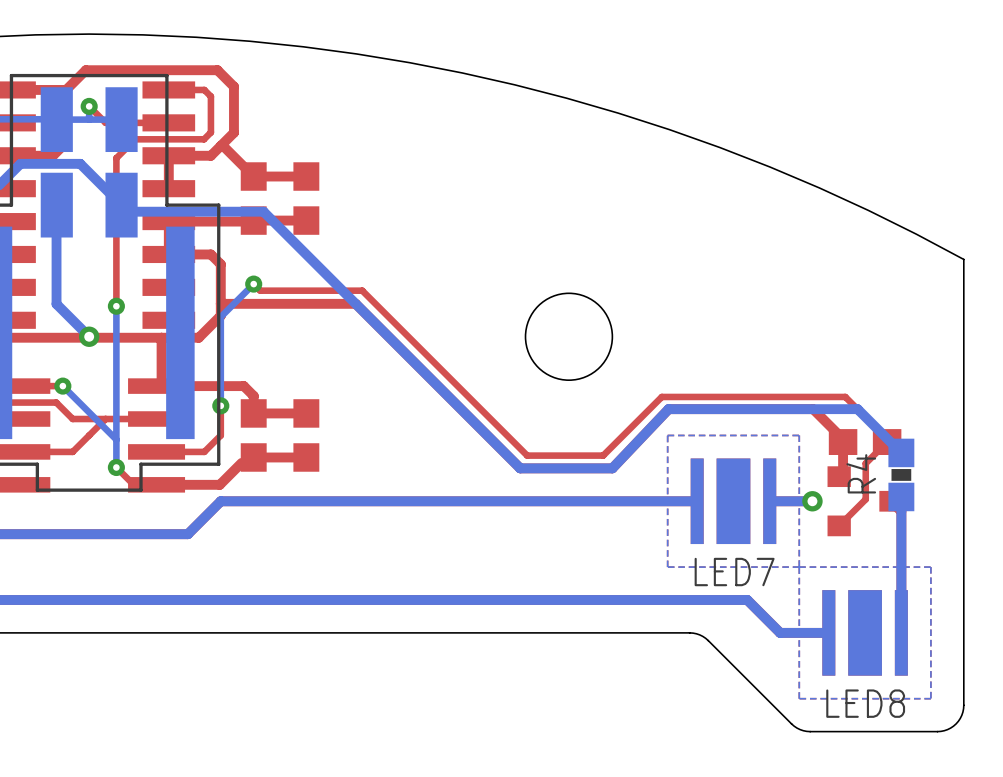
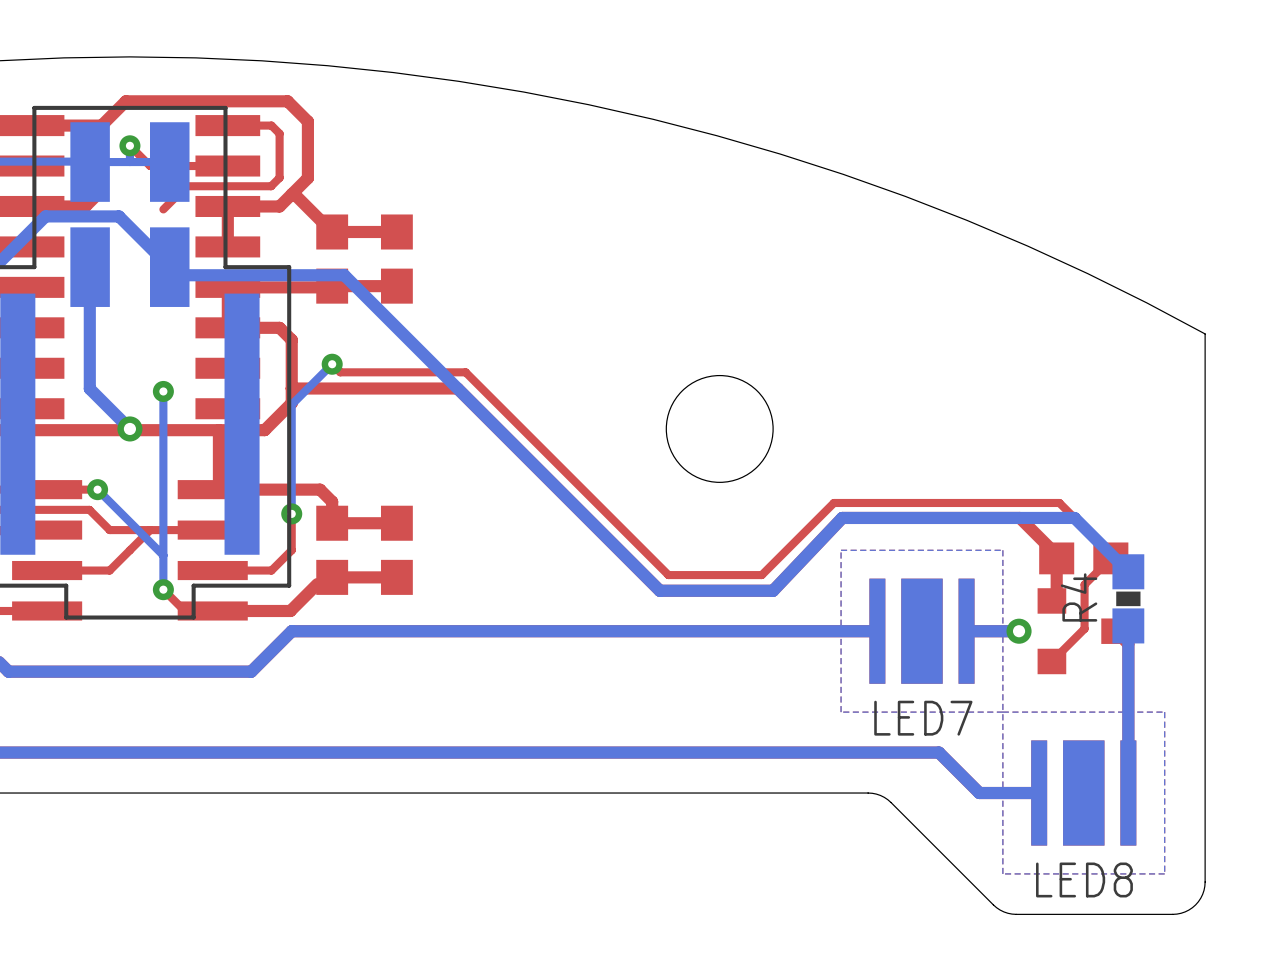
top track: (116, 158) (116, 306) -> none

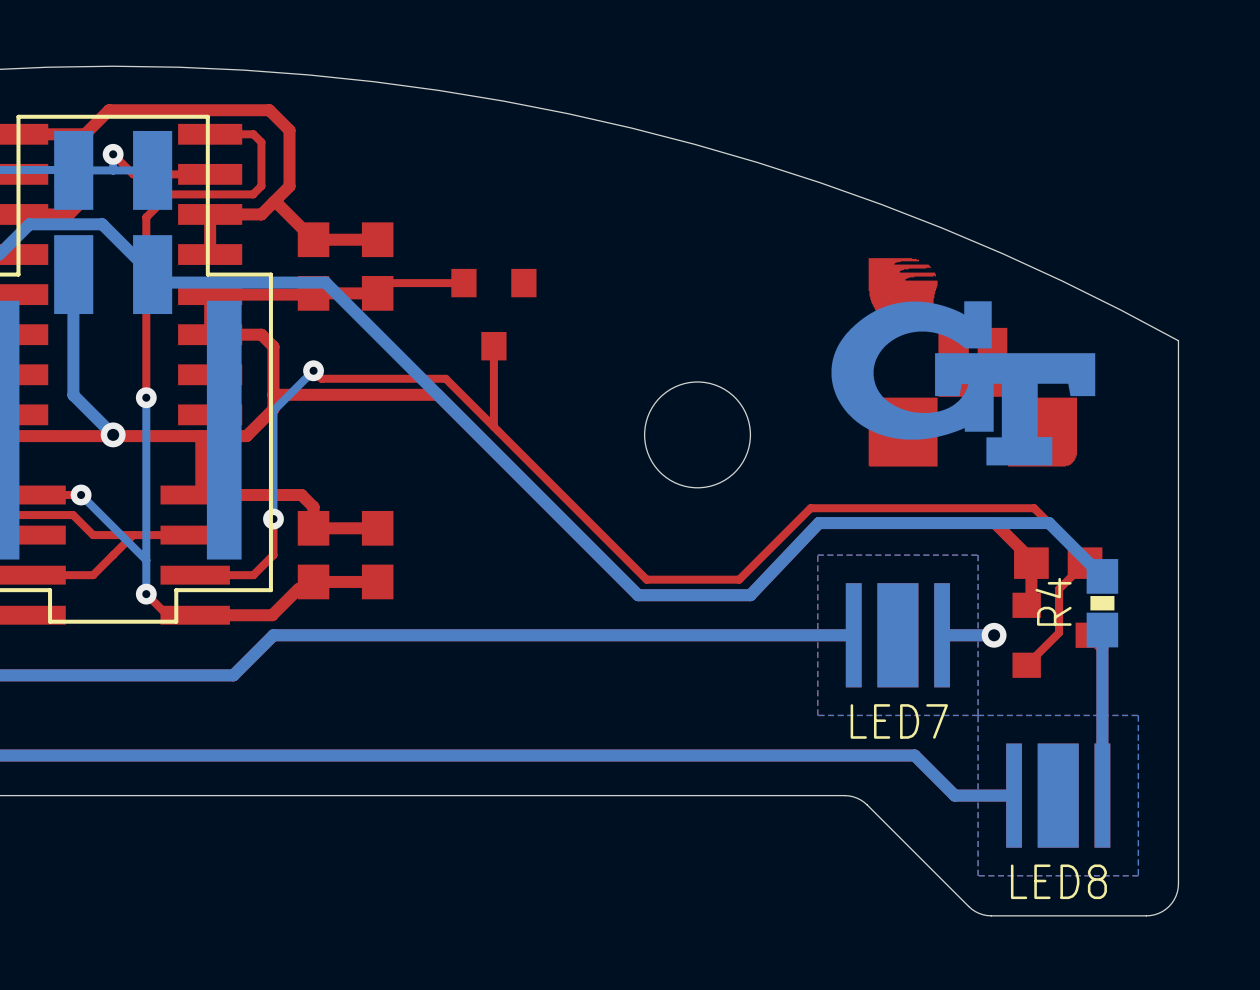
top track: none -> (146, 217) (146, 397)
drawing: none -> [831, 258, 1096, 467]
top track: none -> (463, 283) (379, 283) (368, 293)
part: none -> (493, 314)
top track: none -> (493, 346) (493, 426)

